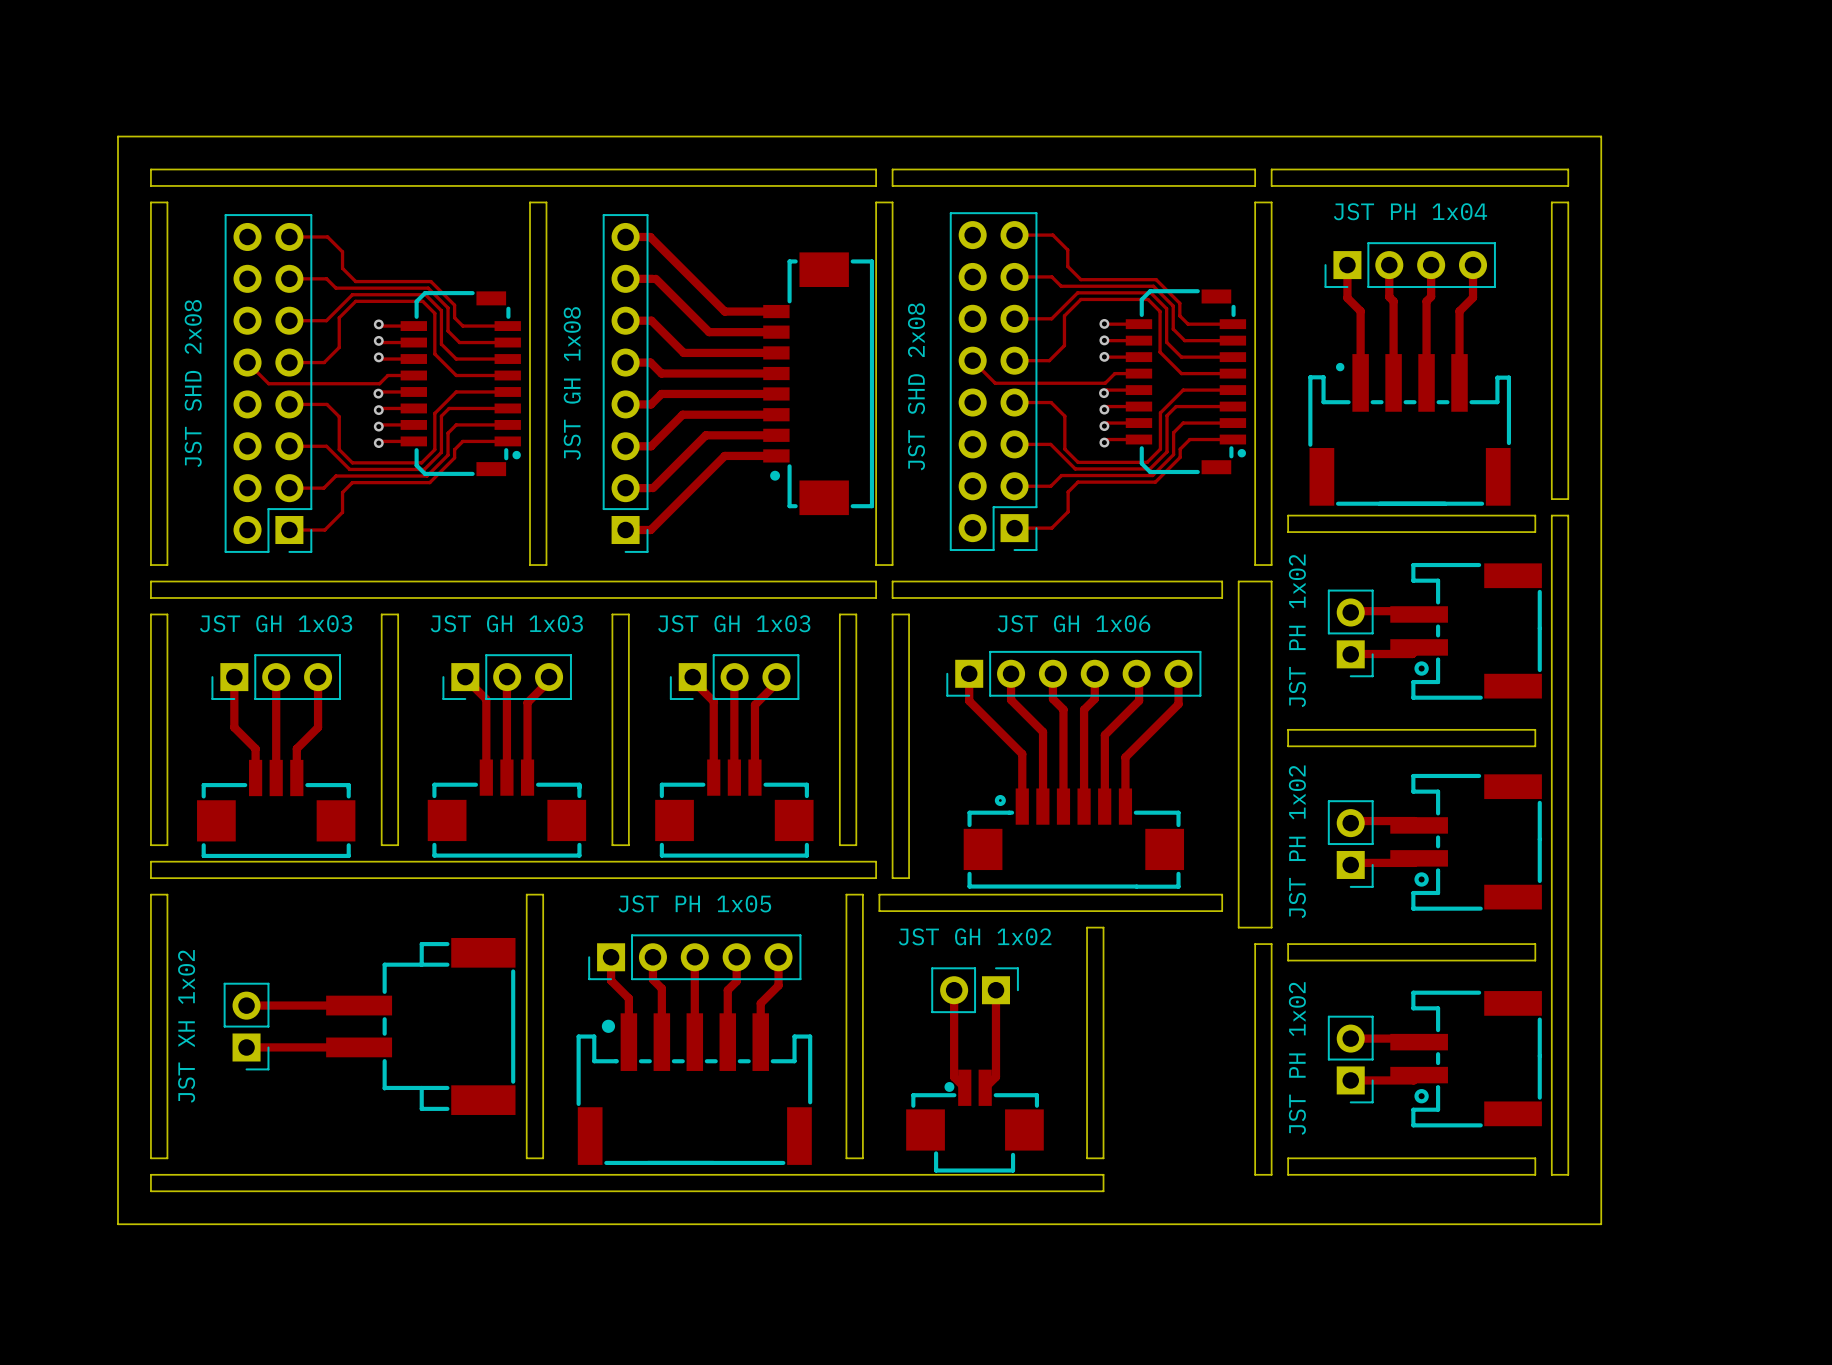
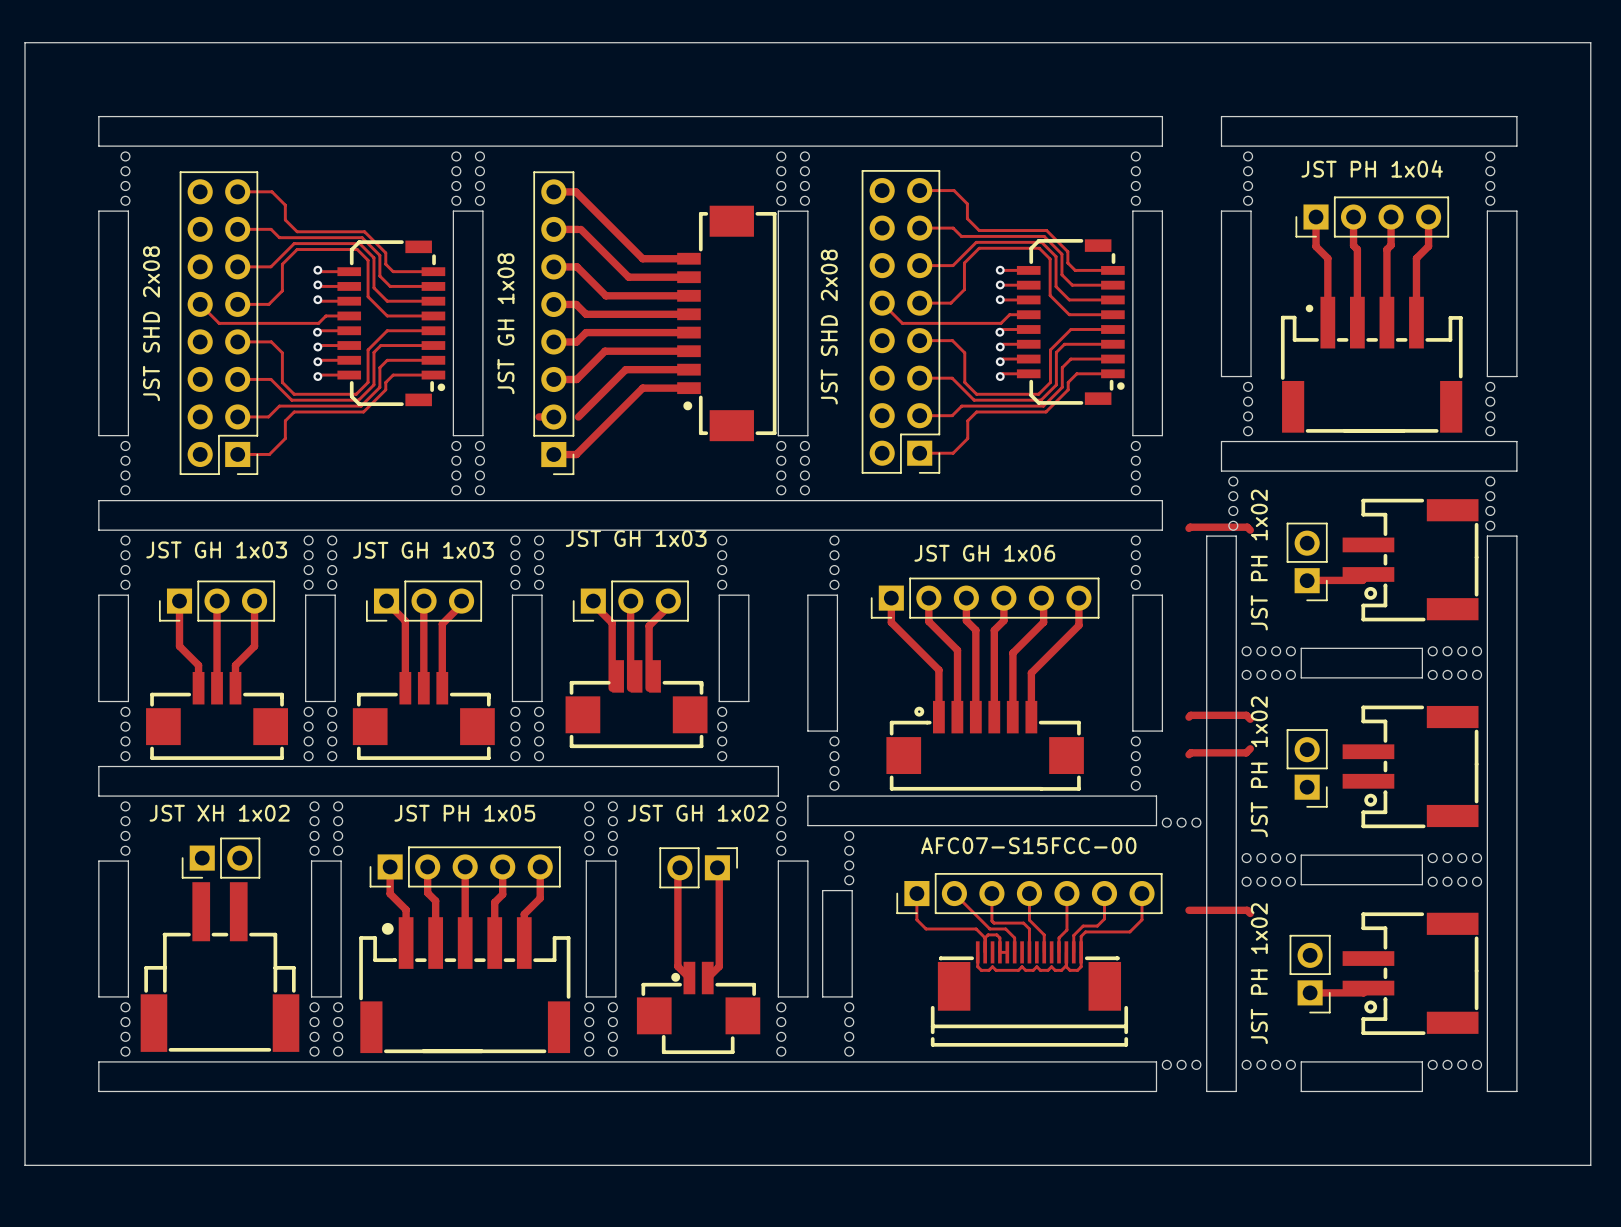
board edge: (117, 136) (1601, 136) (1601, 1224) (117, 1224) (117, 136) -> (25, 42) (25, 1165) (1590, 1165) (1590, 42) (25, 42)
board edge: (150, 185) (150, 169) (876, 169) (876, 185) -> (113, 146) (98, 146) (98, 116) (1162, 116) (1162, 146)
board edge: (892, 185) (892, 169) (1255, 169) (1255, 185) -> (778, 146) (763, 146)
board edge: none -> (1103, 146) (1118, 146)
board edge: (1271, 185) (1271, 169) (1568, 169) (1568, 185) -> (1221, 146) (1221, 116) (1516, 116) (1516, 146) (1383, 146)
board edge: (1321, 185) (1386, 185) -> none
round board edge: none -> [120, 151, 131, 162]
round board edge: none -> [451, 151, 462, 162]
round board edge: none -> [475, 151, 485, 162]
round board edge: none -> [776, 151, 787, 162]
round board edge: none -> [800, 151, 810, 162]
round board edge: none -> [1131, 151, 1141, 162]
round board edge: none -> [1243, 151, 1253, 162]
round board edge: none -> [1485, 151, 1496, 162]
board edge: (1255, 202) (1255, 565) (1271, 565) (1271, 202) (1255, 202) -> none
board edge: (1551, 202) (1568, 202) (1568, 499) (1551, 499) (1551, 202) -> none
round board edge: none -> [120, 166, 131, 177]
round board edge: none -> [451, 166, 462, 177]
round board edge: none -> [475, 166, 485, 177]
round board edge: none -> [776, 166, 787, 177]
round board edge: none -> [800, 166, 810, 177]
round board edge: none -> [1131, 166, 1141, 177]
round board edge: none -> [1243, 166, 1253, 177]
round board edge: none -> [1485, 166, 1496, 177]
round board edge: none -> [120, 181, 131, 191]
round board edge: none -> [451, 181, 462, 191]
round board edge: none -> [475, 181, 485, 191]
round board edge: none -> [776, 181, 787, 191]
round board edge: none -> [800, 181, 810, 191]
round board edge: none -> [1131, 181, 1141, 191]
round board edge: none -> [1243, 181, 1253, 191]
round board edge: none -> [1485, 181, 1496, 191]
track: (1014, 235) (1052, 235) (1067, 250) (1067, 266) (1080, 279) (1156, 279) (1179, 303) (1179, 315) (1188, 324) (1232, 324) -> none
track: none -> (919, 190) (954, 190) (967, 203) (967, 218) (979, 230) (1046, 230) (1067, 251) (1067, 263) (1075, 270) (1112, 270)
track: (650, 236) (724, 311) (776, 311) -> (561, 191) (575, 191) (642, 258) (688, 258)
round board edge: none -> [120, 195, 131, 206]
round board edge: none -> [451, 195, 462, 206]
round board edge: none -> [475, 195, 485, 206]
round board edge: none -> [776, 195, 787, 206]
round board edge: none -> [800, 195, 810, 206]
round board edge: none -> [1131, 195, 1141, 206]
round board edge: none -> [1243, 195, 1253, 206]
round board edge: none -> [1485, 195, 1496, 206]
board edge: (167, 258) (167, 202) (150, 202) (150, 565) (167, 565) (167, 508) -> (128, 211) (98, 211) (98, 435) (128, 435)
board edge: (530, 258) (530, 202) (546, 202) (546, 565) (530, 565) (530, 508) -> (453, 211) (482, 211) (482, 435) (453, 435)
board edge: (892, 258) (892, 202) (876, 202) (876, 565) (892, 565) (892, 509) -> (778, 211) (807, 211) (807, 435) (778, 435)
board edge: none -> (1132, 211) (1162, 211) (1162, 435) (1132, 435) (1132, 211)
board edge: none -> (1221, 211) (1251, 211) (1251, 376) (1221, 376) (1221, 211)
board edge: none -> (1487, 211) (1487, 376) (1516, 376) (1516, 211) (1487, 211)
track: (1347, 265) (1347, 298) (1360, 311) (1360, 382) -> (1316, 217) (1316, 246) (1327, 258) (1327, 322)
track: (1389, 265) (1389, 297) (1393, 301) (1393, 382) -> (1353, 217) (1353, 245) (1357, 249) (1357, 322)
part position: (1410, 265) -> (1372, 217)
track: (1431, 265) (1431, 296) (1426, 301) (1426, 382) -> (1391, 217) (1391, 245) (1386, 249) (1386, 322)
track: (1473, 265) (1473, 297) (1459, 311) (1459, 382) -> (1428, 217) (1428, 246) (1416, 258) (1416, 322)
track: (1014, 276) (1051, 276) (1061, 286) (1153, 286) (1173, 306) (1173, 329) (1184, 340) (1232, 340) -> none
track: none -> (919, 228) (953, 228) (961, 236) (1044, 236) (1061, 254) (1061, 274) (1072, 285) (1112, 285)
track: (655, 278) (709, 332) (776, 332) -> (580, 229) (628, 277) (688, 277)
track: (1014, 318) (1051, 318) (1077, 292) (1150, 292) (1166, 308) (1166, 342) (1181, 357) (1232, 357) -> none
track: none -> (919, 265) (953, 265) (976, 242) (1041, 242) (1056, 256) (1056, 286) (1069, 299) (1112, 299)
track: (651, 320) (683, 352) (776, 352) -> (562, 266) (577, 266) (605, 295) (688, 295)
track: (1104, 323) (1138, 324) -> none
via: (1104, 323) -> none
track: none -> (1000, 270) (1028, 270)
via: none -> (1000, 270)
track: (1104, 340) (1138, 340) -> none
via: (1104, 340) -> none
track: none -> (1000, 284) (1028, 285)
via: none -> (1000, 284)
track: (1104, 356) (1138, 357) -> none
via: (1104, 356) -> none
track: none -> (1000, 299) (1028, 299)
via: none -> (1000, 299)
track: (972, 360) (995, 383) (1105, 383) (1114, 373) (1138, 373) -> none
track: (1014, 360) (1049, 360) (1064, 345) (1064, 315) (1080, 299) (1147, 299) (1160, 311) (1160, 352) (1181, 373) (1232, 373) -> none
track: none -> (882, 303) (902, 323) (1000, 323) (1009, 314) (1028, 314)
track: none -> (919, 303) (950, 303) (964, 289) (964, 263) (979, 248) (1039, 248) (1050, 259) (1050, 295) (1069, 314) (1112, 314)
track: (625, 362) (650, 362) (661, 373) (776, 373) -> (553, 304) (576, 304) (586, 314) (688, 314)
part position: (993, 381) -> (900, 321)
part position: (1185, 381) -> (1070, 321)
part position: (625, 383) -> (553, 323)
part position: (818, 383) -> (726, 323)
track: (1138, 390) (1107, 390) (1103, 393) -> none
track: none -> (1028, 329) (1002, 329) (999, 332)
track: (1232, 390) (1183, 390) (1160, 412) (1160, 449) (1147, 462) (1078, 462) (1064, 449) (1064, 416) (1051, 402) (1014, 402) -> none
track: none -> (1112, 329) (1070, 329) (1050, 349) (1050, 382) (1038, 394) (976, 394) (964, 382) (964, 352) (952, 340) (919, 340)
track: (776, 393) (661, 393) (651, 404) (625, 404) -> (688, 332) (586, 332) (576, 341) (553, 341)
via: (1103, 393) -> none
via: none -> (999, 332)
track: (1138, 406) (1107, 406) (1104, 409) -> none
track: (1232, 406) (1176, 406) (1167, 415) (1167, 451) (1149, 468) (1075, 468) (1050, 444) (1014, 444) -> none
track: none -> (1028, 344) (1002, 344) (1000, 347)
track: none -> (1112, 344) (1064, 344) (1056, 352) (1056, 384) (1041, 400) (974, 400) (952, 378) (919, 378)
via: (1104, 409) -> none
via: none -> (1000, 347)
track: (776, 414) (682, 414) (651, 446) (625, 446) -> (688, 351) (605, 351) (576, 379) (553, 379)
track: (1138, 423) (1107, 423) (1104, 426) -> none
track: none -> (1028, 359) (1002, 359) (1000, 361)
track: (1232, 423) (1183, 423) (1173, 432) (1173, 454) (1152, 475) (1061, 475) (1050, 486) (1014, 486) -> none
track: none -> (1112, 359) (1070, 359) (1062, 367) (1062, 387) (1043, 406) (961, 406) (952, 415) (919, 415)
via: (1104, 426) -> none
via: none -> (1000, 361)
part position: (1409, 429) -> (1371, 364)
track: (776, 435) (705, 435) (653, 488) -> (688, 369) (625, 369) (578, 417)
track: (1138, 439) (1107, 439) (1104, 442) -> none
track: (1232, 439) (1189, 439) (1180, 449) (1180, 457) (1155, 482) (1078, 482) (1068, 492) (1068, 511) (1051, 528) (1014, 528) -> none
track: none -> (1028, 373) (1002, 373) (1000, 376)
track: none -> (1112, 373) (1076, 373) (1068, 382) (1068, 389) (1045, 411) (976, 411) (967, 420) (967, 438) (953, 453) (919, 453)
via: (1104, 442) -> none
via: none -> (1000, 376)
round board edge: none -> [1243, 382, 1253, 392]
round board edge: none -> [1485, 382, 1496, 392]
track: (776, 455) (724, 455) (650, 530) -> (688, 388) (642, 388) (576, 454) (561, 454)
round board edge: none -> [1243, 396, 1253, 407]
round board edge: none -> [1485, 396, 1496, 407]
round board edge: none -> [1243, 411, 1253, 422]
round board edge: none -> [1485, 411, 1496, 422]
round board edge: none -> [1243, 426, 1253, 437]
round board edge: none -> [1485, 426, 1496, 437]
round board edge: none -> [120, 441, 131, 451]
round board edge: none -> [451, 441, 462, 451]
round board edge: none -> [475, 441, 485, 451]
round board edge: none -> [776, 441, 787, 451]
round board edge: none -> [800, 441, 810, 451]
round board edge: none -> [1131, 441, 1141, 451]
board edge: (1386, 515) (1288, 515) (1288, 532) (1535, 532) (1535, 515) -> (1221, 441) (1221, 471) (1516, 471) (1516, 441) (1383, 441)
board edge: (1551, 515) (1551, 1174) (1568, 1174) (1568, 515) -> (1369, 441) (1354, 441)
round board edge: none -> [120, 455, 131, 466]
round board edge: none -> [451, 455, 462, 466]
round board edge: none -> [475, 455, 485, 466]
round board edge: none -> [776, 455, 787, 466]
round board edge: none -> [800, 455, 810, 466]
round board edge: none -> [1131, 455, 1141, 466]
round board edge: none -> [120, 470, 131, 481]
round board edge: none -> [451, 470, 462, 481]
round board edge: none -> [475, 470, 485, 481]
round board edge: none -> [776, 470, 787, 481]
round board edge: none -> [800, 470, 810, 481]
round board edge: none -> [1131, 470, 1141, 481]
round board edge: none -> [1228, 476, 1239, 487]
round board edge: none -> [1485, 476, 1496, 487]
round board edge: none -> [120, 485, 131, 496]
round board edge: none -> [451, 485, 462, 496]
round board edge: none -> [475, 485, 485, 496]
round board edge: none -> [776, 485, 787, 496]
round board edge: none -> [800, 485, 810, 496]
round board edge: none -> [1131, 485, 1141, 496]
round board edge: none -> [1228, 491, 1239, 501]
round board edge: none -> [1485, 491, 1496, 501]
board edge: (150, 581) (150, 597) (876, 597) (876, 581) -> (113, 500) (98, 500) (98, 530) (113, 530)
board edge: (892, 581) (892, 597) (1222, 597) (1222, 581) -> (778, 500) (763, 500)
board edge: (1238, 581) (1238, 927) (1271, 927) (1271, 581) -> (1088, 500) (1073, 500)
round board edge: none -> [1228, 506, 1239, 516]
round board edge: none -> [1485, 506, 1496, 516]
round board edge: none -> [1228, 520, 1239, 531]
round board edge: none -> [1485, 520, 1496, 531]
board edge: (150, 614) (150, 845) (167, 845) (167, 805) -> (128, 595) (98, 595) (98, 701) (128, 701)
board edge: (167, 614) (167, 686) -> (128, 530) (320, 530)
board edge: (381, 614) (381, 845) (398, 845) (398, 805) -> (335, 595) (305, 595) (305, 701) (335, 701)
board edge: (398, 614) (398, 686) -> (335, 530) (527, 530)
board edge: (612, 614) (612, 845) (628, 845) (628, 805) -> (542, 595) (512, 595) (512, 701) (542, 701)
board edge: (628, 614) (628, 686) -> (542, 530) (731, 530)
board edge: (839, 614) (839, 845) (856, 845) (856, 614) -> (778, 530) (745, 530)
board edge: (892, 614) (892, 878) (909, 878) (909, 614) -> (1118, 500) (1162, 500) (1162, 530) (793, 530)
round board edge: none -> [120, 535, 131, 546]
round board edge: none -> [303, 535, 314, 546]
round board edge: none -> [327, 535, 338, 546]
round board edge: none -> [510, 535, 521, 546]
round board edge: none -> [534, 535, 544, 546]
round board edge: none -> [717, 535, 728, 546]
round board edge: none -> [829, 535, 840, 546]
round board edge: none -> [1131, 535, 1141, 546]
board edge: none -> (1206, 536) (1206, 1091) (1236, 1091) (1236, 536) (1206, 536)
board edge: none -> (1487, 536) (1487, 1091) (1516, 1091) (1516, 536) (1487, 536)
part: JST PH 1x02 (1466, 631) -> none
part: (1350, 633) -> none
round board edge: none -> [120, 550, 131, 561]
round board edge: none -> [303, 550, 314, 561]
round board edge: none -> [327, 550, 338, 561]
round board edge: none -> [510, 550, 521, 561]
round board edge: none -> [534, 550, 544, 561]
round board edge: none -> [717, 550, 728, 561]
round board edge: none -> [829, 550, 840, 561]
round board edge: none -> [1131, 550, 1141, 561]
track: (1419, 647) (1412, 654) (1350, 654) -> (1368, 574) (1362, 580) (1307, 580)
part: none -> JST PH 1x02 (1410, 560)
part: none -> (1307, 561)
round board edge: none -> [120, 565, 131, 575]
round board edge: none -> [303, 565, 314, 575]
round board edge: none -> [327, 565, 338, 575]
round board edge: none -> [510, 565, 521, 575]
round board edge: none -> [534, 565, 544, 575]
round board edge: none -> [717, 565, 728, 575]
round board edge: none -> [829, 565, 840, 575]
round board edge: none -> [1131, 565, 1141, 575]
round board edge: none -> [120, 580, 131, 590]
round board edge: none -> [303, 580, 314, 590]
round board edge: none -> [327, 580, 338, 590]
round board edge: none -> [510, 580, 521, 590]
round board edge: none -> [534, 580, 544, 590]
round board edge: none -> [717, 580, 728, 590]
round board edge: none -> [829, 580, 840, 590]
round board edge: none -> [1131, 580, 1141, 590]
track: (969, 673) (969, 700) (1022, 754) (1022, 806) -> (891, 598) (891, 622) (938, 670) (938, 717)
track: (1011, 673) (1011, 700) (1043, 731) (1043, 806) -> (928, 598) (928, 621) (957, 650) (957, 716)
track: (1052, 673) (1052, 699) (1063, 709) (1063, 806) -> (966, 598) (966, 620) (975, 630) (975, 717)
part position: (1073, 673) -> (985, 598)
track: (1094, 673) (1094, 699) (1084, 709) (1084, 806) -> (1003, 598) (1003, 620) (994, 630) (994, 717)
track: (1139, 673) (1139, 700) (1104, 735) (1104, 806) -> (1043, 598) (1043, 622) (1012, 653) (1012, 716)
track: (1178, 673) (1178, 704) (1125, 757) (1125, 806) -> (1078, 598) (1078, 625) (1031, 673) (1031, 717)
track: (234, 677) (234, 727) (255, 748) (255, 777) -> none
track: (276, 677) (276, 777) -> none
part position: (276, 677) -> (217, 601)
track: (318, 677) (318, 727) (296, 748) (296, 777) -> none
track: (465, 677) (486, 699) (486, 777) -> none
track: (507, 677) (506, 777) -> none
part position: (507, 677) -> (424, 601)
track: (549, 677) (549, 681) (527, 702) (527, 777) -> none
track: (692, 677) (692, 680) (713, 701) (713, 777) -> none
track: (734, 677) (734, 777) -> none
part position: (734, 677) -> (630, 601)
track: (776, 677) (776, 683) (754, 704) (754, 777) -> none
board edge: none -> (719, 595) (748, 595) (748, 701) (719, 701) (719, 595)
board edge: none -> (807, 595) (837, 595) (837, 731) (807, 731) (807, 595)
track: none -> (179, 601) (179, 646) (198, 665) (198, 688)
track: none -> (217, 601) (217, 688)
track: none -> (254, 601) (254, 646) (235, 665) (235, 688)
track: none -> (386, 601) (405, 621) (405, 688)
track: none -> (424, 601) (423, 688)
track: none -> (461, 601) (461, 604) (442, 623) (442, 688)
track: none -> (593, 601) (593, 604) (612, 623) (612, 688)
track: none -> (630, 601) (630, 688)
track: none -> (668, 601) (668, 606) (649, 626) (649, 688)
board edge: (1288, 729) (1535, 729) (1535, 746) -> (1301, 648) (1301, 677) (1422, 677) (1422, 648) (1354, 648)
round board edge: none -> [1241, 646, 1252, 657]
round board edge: none -> [1256, 646, 1267, 657]
round board edge: none -> [1271, 646, 1281, 657]
round board edge: none -> [1286, 646, 1296, 657]
round board edge: none -> [1427, 646, 1438, 657]
round board edge: none -> [1442, 646, 1453, 657]
round board edge: none -> [1457, 646, 1468, 657]
round board edge: none -> [1472, 646, 1482, 657]
board edge: (1288, 746) (1475, 746) -> (1132, 648) (1132, 731) (1162, 731) (1162, 595) (1132, 595) (1132, 633)
round board edge: none -> [1241, 670, 1252, 680]
round board edge: none -> [1256, 670, 1267, 680]
round board edge: none -> [1271, 670, 1281, 680]
round board edge: none -> [1286, 670, 1296, 680]
round board edge: none -> [1427, 670, 1438, 680]
round board edge: none -> [1442, 670, 1453, 680]
round board edge: none -> [1457, 670, 1468, 680]
round board edge: none -> [1472, 670, 1482, 680]
part position: (276, 808) -> (217, 715)
part position: (506, 808) -> (423, 715)
round board edge: none -> [120, 707, 131, 717]
round board edge: none -> [303, 707, 314, 717]
round board edge: none -> [327, 707, 338, 717]
round board edge: none -> [510, 707, 521, 717]
round board edge: none -> [534, 707, 544, 717]
round board edge: none -> [717, 707, 728, 717]
round board edge: none -> [120, 721, 131, 732]
round board edge: none -> [303, 721, 314, 732]
round board edge: none -> [327, 721, 338, 732]
round board edge: none -> [510, 721, 521, 732]
round board edge: none -> [534, 721, 544, 732]
round board edge: none -> [717, 721, 728, 732]
part position: (1073, 838) -> (985, 745)
part: JST PH 1x02 (1466, 842) -> none
round board edge: none -> [120, 736, 131, 747]
round board edge: none -> [303, 736, 314, 747]
round board edge: none -> [327, 736, 338, 747]
round board edge: none -> [510, 736, 521, 747]
round board edge: none -> [534, 736, 544, 747]
round board edge: none -> [717, 736, 728, 747]
round board edge: none -> [829, 736, 840, 747]
round board edge: none -> [1131, 736, 1141, 747]
part: (1350, 844) -> none
round board edge: none -> [120, 751, 131, 761]
round board edge: none -> [303, 751, 314, 761]
round board edge: none -> [327, 751, 338, 761]
round board edge: none -> [510, 751, 521, 761]
round board edge: none -> [534, 751, 544, 761]
round board edge: none -> [717, 751, 728, 761]
round board edge: none -> [829, 751, 840, 761]
round board edge: none -> [1131, 751, 1141, 761]
round board edge: none -> [829, 766, 840, 776]
round board edge: none -> [1131, 766, 1141, 776]
board edge: (150, 878) (150, 861) (876, 861) (876, 878) -> (113, 766) (98, 766) (98, 796) (766, 796)
part: none -> JST PH 1x02 (1410, 766)
part: none -> (1307, 768)
board edge: (526, 894) (543, 894) (543, 1158) (526, 1158) (526, 894) -> none
board edge: (846, 894) (862, 894) (862, 1158) (846, 1158) (846, 894) -> none
round board edge: none -> [829, 780, 840, 791]
round board edge: none -> [1131, 780, 1141, 791]
part value position: JST PH 1x05 (694, 903) -> JST PH 1x05 (464, 813)
board edge: (879, 911) (879, 894) (1222, 894) (1222, 911) -> none
board edge: (892, 911) (925, 911) -> (778, 796) (778, 766) (763, 766)
board edge: none -> (807, 796) (807, 825) (1103, 825)
round board edge: none -> [120, 801, 131, 812]
round board edge: none -> [309, 801, 320, 812]
round board edge: none -> [333, 801, 343, 812]
round board edge: none -> [584, 801, 595, 812]
round board edge: none -> [608, 801, 618, 812]
round board edge: none -> [776, 801, 787, 812]
board edge: (1087, 927) (1103, 927) (1103, 1158) (1087, 1158) (1087, 927) -> none
round board edge: none -> [120, 816, 131, 826]
round board edge: none -> [309, 816, 320, 826]
round board edge: none -> [333, 816, 343, 826]
round board edge: none -> [584, 816, 595, 826]
round board edge: none -> [608, 816, 618, 826]
round board edge: none -> [776, 816, 787, 826]
round board edge: none -> [1162, 817, 1172, 828]
round board edge: none -> [1176, 817, 1187, 828]
round board edge: none -> [1191, 817, 1202, 828]
part value position: JST GH 1x02 (975, 936) -> JST GH 1x02 (698, 813)
board edge: (1255, 944) (1255, 1174) (1271, 1174) (1271, 944) -> (1132, 825) (1118, 825)
board edge: (1288, 944) (1288, 960) (1535, 960) (1535, 944) (1314, 944) -> (1073, 796) (1156, 796) (1156, 825)
round board edge: none -> [120, 831, 131, 841]
round board edge: none -> [309, 831, 320, 841]
round board edge: none -> [333, 831, 343, 841]
round board edge: none -> [584, 831, 595, 841]
round board edge: none -> [608, 831, 618, 841]
round board edge: none -> [776, 831, 787, 841]
round board edge: none -> [844, 831, 855, 841]
track: (611, 957) (611, 980) (628, 998) (628, 1042) -> none
track: (652, 957) (652, 979) (661, 988) (661, 1042) -> none
track: (694, 957) (694, 1042) -> (465, 866) (465, 943)
part position: (694, 957) -> (465, 866)
track: (736, 957) (736, 981) (727, 990) (727, 1042) -> none
track: (778, 957) (778, 985) (760, 1003) (760, 1042) -> none
round board edge: none -> [120, 845, 131, 856]
round board edge: none -> [309, 845, 320, 856]
round board edge: none -> [333, 845, 343, 856]
round board edge: none -> [584, 845, 595, 856]
round board edge: none -> [608, 845, 618, 856]
round board edge: none -> [776, 845, 787, 856]
round board edge: none -> [844, 845, 855, 856]
round board edge: none -> [1241, 853, 1252, 863]
round board edge: none -> [1256, 853, 1267, 863]
round board edge: none -> [1271, 853, 1281, 863]
round board edge: none -> [1286, 853, 1296, 863]
round board edge: none -> [1427, 853, 1438, 863]
round board edge: none -> [1442, 853, 1453, 863]
round board edge: none -> [1457, 853, 1468, 863]
round board edge: none -> [1472, 853, 1482, 863]
board edge: none -> (1301, 855) (1301, 884) (1422, 884) (1422, 855) (1301, 855)
board edge: (167, 983) (167, 894) (150, 894) (150, 1158) (167, 1158) (167, 1135) -> (128, 861) (98, 861) (98, 996) (128, 996)
board edge: none -> (311, 861) (341, 861) (341, 996) (311, 996) (311, 861)
board edge: none -> (586, 861) (615, 861) (615, 996) (586, 996) (586, 861)
board edge: none -> (778, 861) (807, 861) (807, 996) (778, 996) (778, 861)
round board edge: none -> [844, 860, 855, 871]
track: none -> (390, 866) (390, 893) (406, 909) (406, 943)
track: none -> (427, 866) (427, 892) (435, 900) (435, 943)
track: none -> (502, 866) (502, 894) (494, 902) (494, 943)
track: none -> (540, 866) (540, 898) (524, 914) (524, 943)
track: (954, 990) (954, 1077) (964, 1087) -> none
part position: (975, 990) -> (698, 867)
track: (995, 990) (995, 1076) (985, 1087) -> none
track: none -> (679, 867) (677, 869) (677, 966) (689, 978)
track: none -> (717, 867) (719, 869) (719, 966) (707, 978)
round board edge: none -> [844, 875, 855, 886]
round board edge: none -> [1241, 876, 1252, 887]
round board edge: none -> [1256, 876, 1267, 887]
round board edge: none -> [1271, 876, 1281, 887]
round board edge: none -> [1286, 876, 1296, 887]
round board edge: none -> [1427, 876, 1438, 887]
round board edge: none -> [1442, 876, 1453, 887]
round board edge: none -> [1457, 876, 1468, 887]
round board edge: none -> [1472, 876, 1482, 887]
track: (246, 1005) (359, 1005) -> none
board edge: none -> (822, 890) (852, 890) (852, 996) (822, 996) (822, 890)
track: none -> (916, 893) (916, 919) (926, 928) (976, 928) (985, 937)
track: none -> (954, 893) (989, 928) (1005, 928) (1014, 937) (1014, 952)
track: none -> (991, 893) (991, 921) (994, 923) (1023, 923) (1029, 928) (1029, 952)
track: none -> (1029, 893) (1029, 920) (1044, 934) (1044, 952)
part: none -> (1029, 893)
track: none -> (1066, 893) (1066, 929) (1059, 937) (1059, 952)
track: none -> (1104, 893) (1104, 918) (1097, 926) (1083, 926) (1073, 935) (1073, 952)
track: none -> (1142, 893) (1142, 919) (1129, 931) (1085, 931) (1081, 936) (1081, 966) (1077, 970) (1069, 970) (1066, 966) (1066, 952)
part value position: JST XH 1x02 (186, 1026) -> JST XH 1x02 (219, 813)
part rotation: 0° (246, 1026) -> 90° clockwise (221, 858)
part rotation: 0° (420, 1026) -> 90° clockwise (219, 967)
part position: (420, 1026) -> (219, 967)
track: (246, 1047) (359, 1047) -> none
part: (1350, 1059) -> none
part: JST PH 1x02 (1466, 1059) -> none
track: (1419, 1075) (1413, 1080) (1350, 1080) -> none
track: none -> (977, 952) (977, 966) (981, 970) (988, 970) (992, 966) (996, 970) (1018, 970) (1022, 966) (1025, 970) (1033, 970) (1036, 966) (1040, 970) (1048, 970) (1051, 966) (1055, 970) (1061, 970) (1066, 965)
track: none -> (985, 952) (985, 937) (988, 934) (996, 934) (999, 937) (999, 952) (1007, 952)
part position: (694, 1089) -> (464, 985)
part: none -> (1310, 974)
part: none -> JST PH 1x02 (1410, 973)
part position: (974, 1121) -> (698, 1007)
track: none -> (1368, 988) (1363, 992) (1310, 992)
part: none -> AFC07-S15FCC-00 (1029, 993)
round board edge: none -> [120, 1002, 131, 1013]
round board edge: none -> [309, 1002, 320, 1013]
round board edge: none -> [333, 1002, 343, 1013]
round board edge: none -> [584, 1002, 595, 1013]
round board edge: none -> [608, 1002, 618, 1013]
round board edge: none -> [776, 1002, 787, 1013]
round board edge: none -> [844, 1002, 855, 1013]
round board edge: none -> [120, 1017, 131, 1027]
round board edge: none -> [309, 1017, 320, 1027]
round board edge: none -> [333, 1017, 343, 1027]
round board edge: none -> [584, 1017, 595, 1027]
round board edge: none -> [608, 1017, 618, 1027]
round board edge: none -> [776, 1017, 787, 1027]
round board edge: none -> [844, 1017, 855, 1027]
board edge: (1288, 1158) (1288, 1174) (1535, 1174) (1535, 1158) (1288, 1158) -> none
board edge: (150, 1174) (1103, 1174) (1103, 1191) (150, 1191) (150, 1174) -> none
round board edge: none -> [120, 1032, 131, 1042]
round board edge: none -> [309, 1032, 320, 1042]
round board edge: none -> [333, 1032, 343, 1042]
round board edge: none -> [584, 1032, 595, 1042]
round board edge: none -> [608, 1032, 618, 1042]
round board edge: none -> [776, 1032, 787, 1042]
round board edge: none -> [844, 1032, 855, 1042]
round board edge: none -> [120, 1046, 131, 1057]
round board edge: none -> [309, 1046, 320, 1057]
round board edge: none -> [333, 1046, 343, 1057]
round board edge: none -> [584, 1046, 595, 1057]
round board edge: none -> [608, 1046, 618, 1057]
round board edge: none -> [776, 1046, 787, 1057]
round board edge: none -> [844, 1046, 855, 1057]
round board edge: none -> [1162, 1060, 1172, 1070]
round board edge: none -> [1176, 1060, 1187, 1070]
round board edge: none -> [1191, 1060, 1202, 1070]
round board edge: none -> [1241, 1060, 1252, 1070]
round board edge: none -> [1256, 1060, 1267, 1070]
round board edge: none -> [1271, 1060, 1281, 1070]
round board edge: none -> [1286, 1060, 1296, 1070]
round board edge: none -> [1427, 1060, 1438, 1070]
round board edge: none -> [1442, 1060, 1453, 1070]
round board edge: none -> [1457, 1060, 1468, 1070]
round board edge: none -> [1472, 1060, 1482, 1070]
board edge: none -> (98, 1061) (98, 1091) (1156, 1091) (1156, 1061) (98, 1061)
board edge: none -> (1301, 1061) (1301, 1091) (1422, 1091) (1422, 1061) (1301, 1061)

